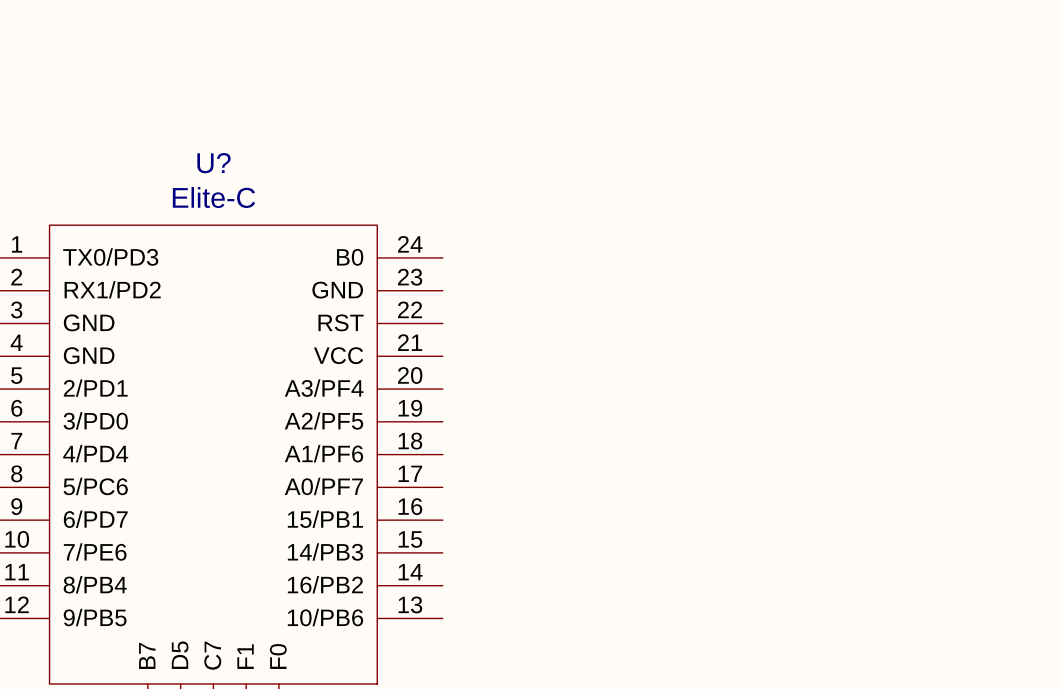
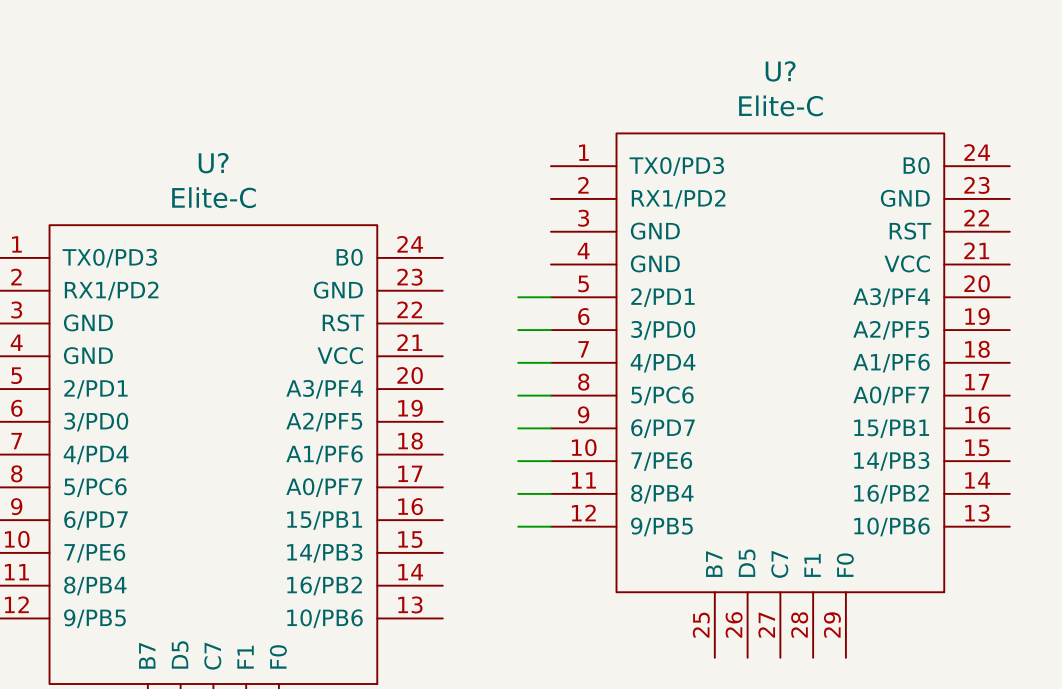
wire: none -> (518, 297) (550, 297)
wire: none -> (518, 330) (550, 330)
wire: none -> (518, 362) (550, 362)
wire: none -> (518, 395) (550, 395)
U?: none -> Elite-C (780, 395)
wire: none -> (518, 428) (550, 428)
wire: none -> (518, 461) (550, 461)
wire: none -> (518, 493) (550, 493)
wire: none -> (518, 526) (550, 526)

